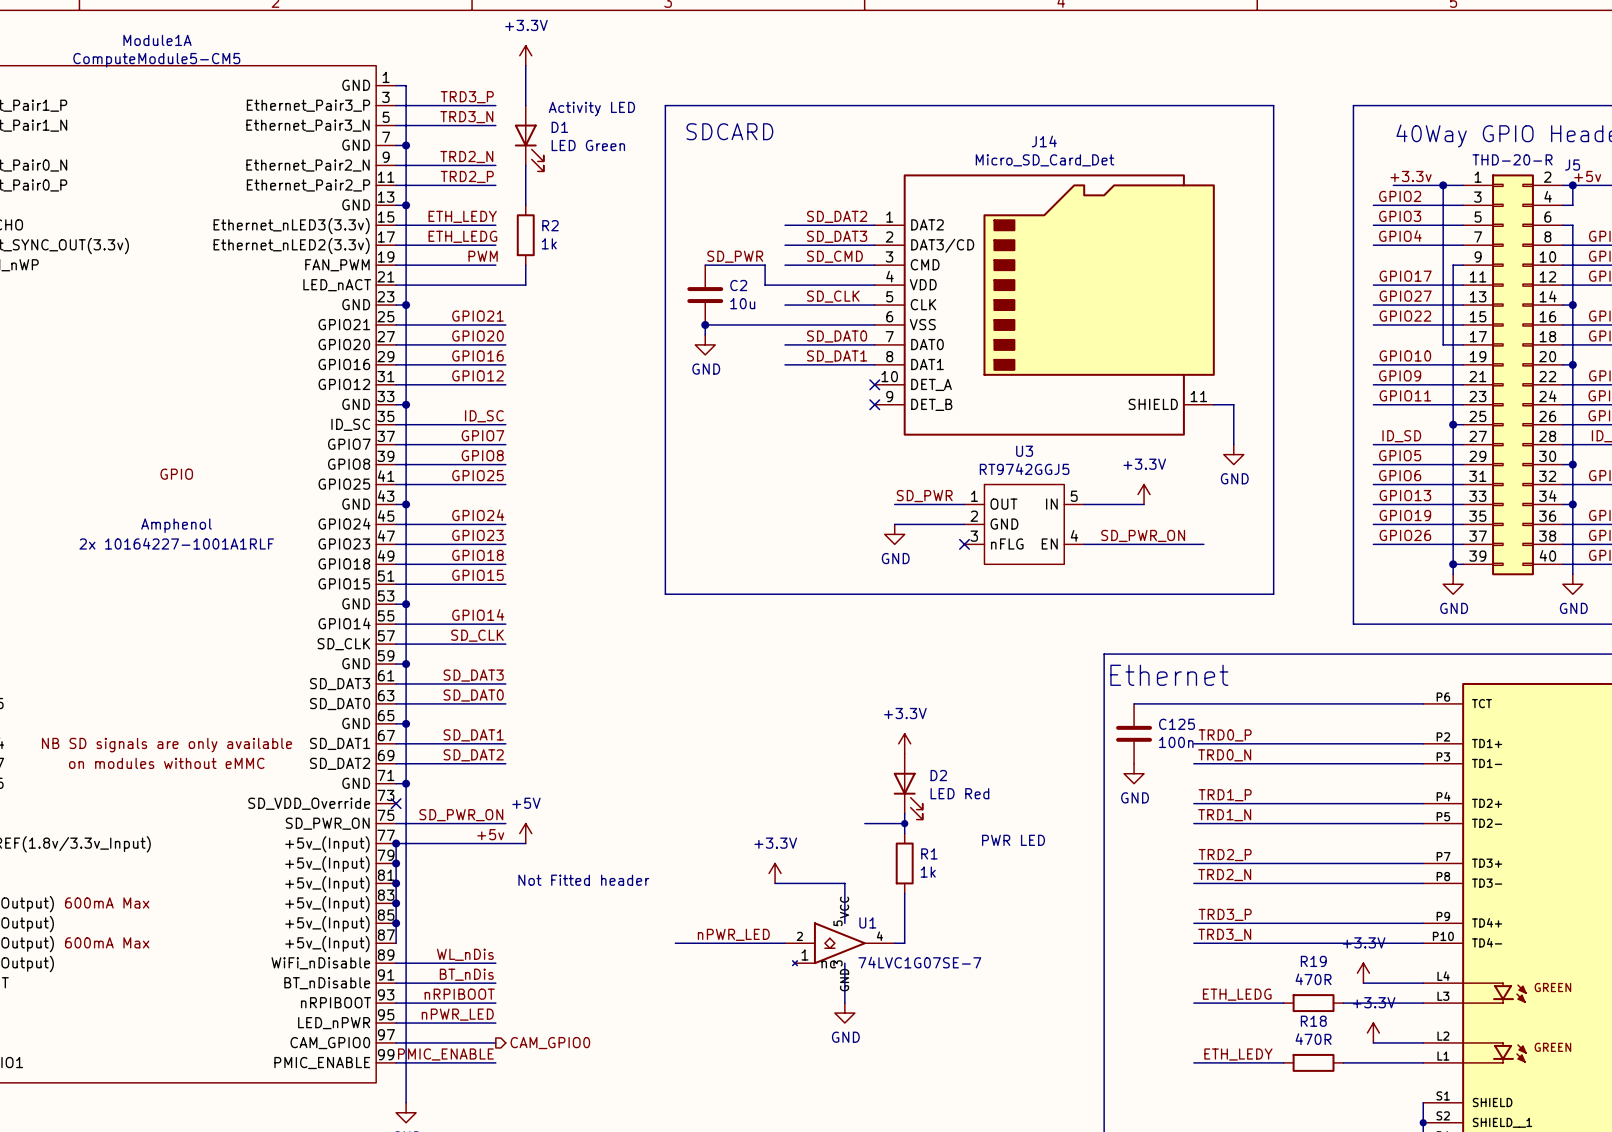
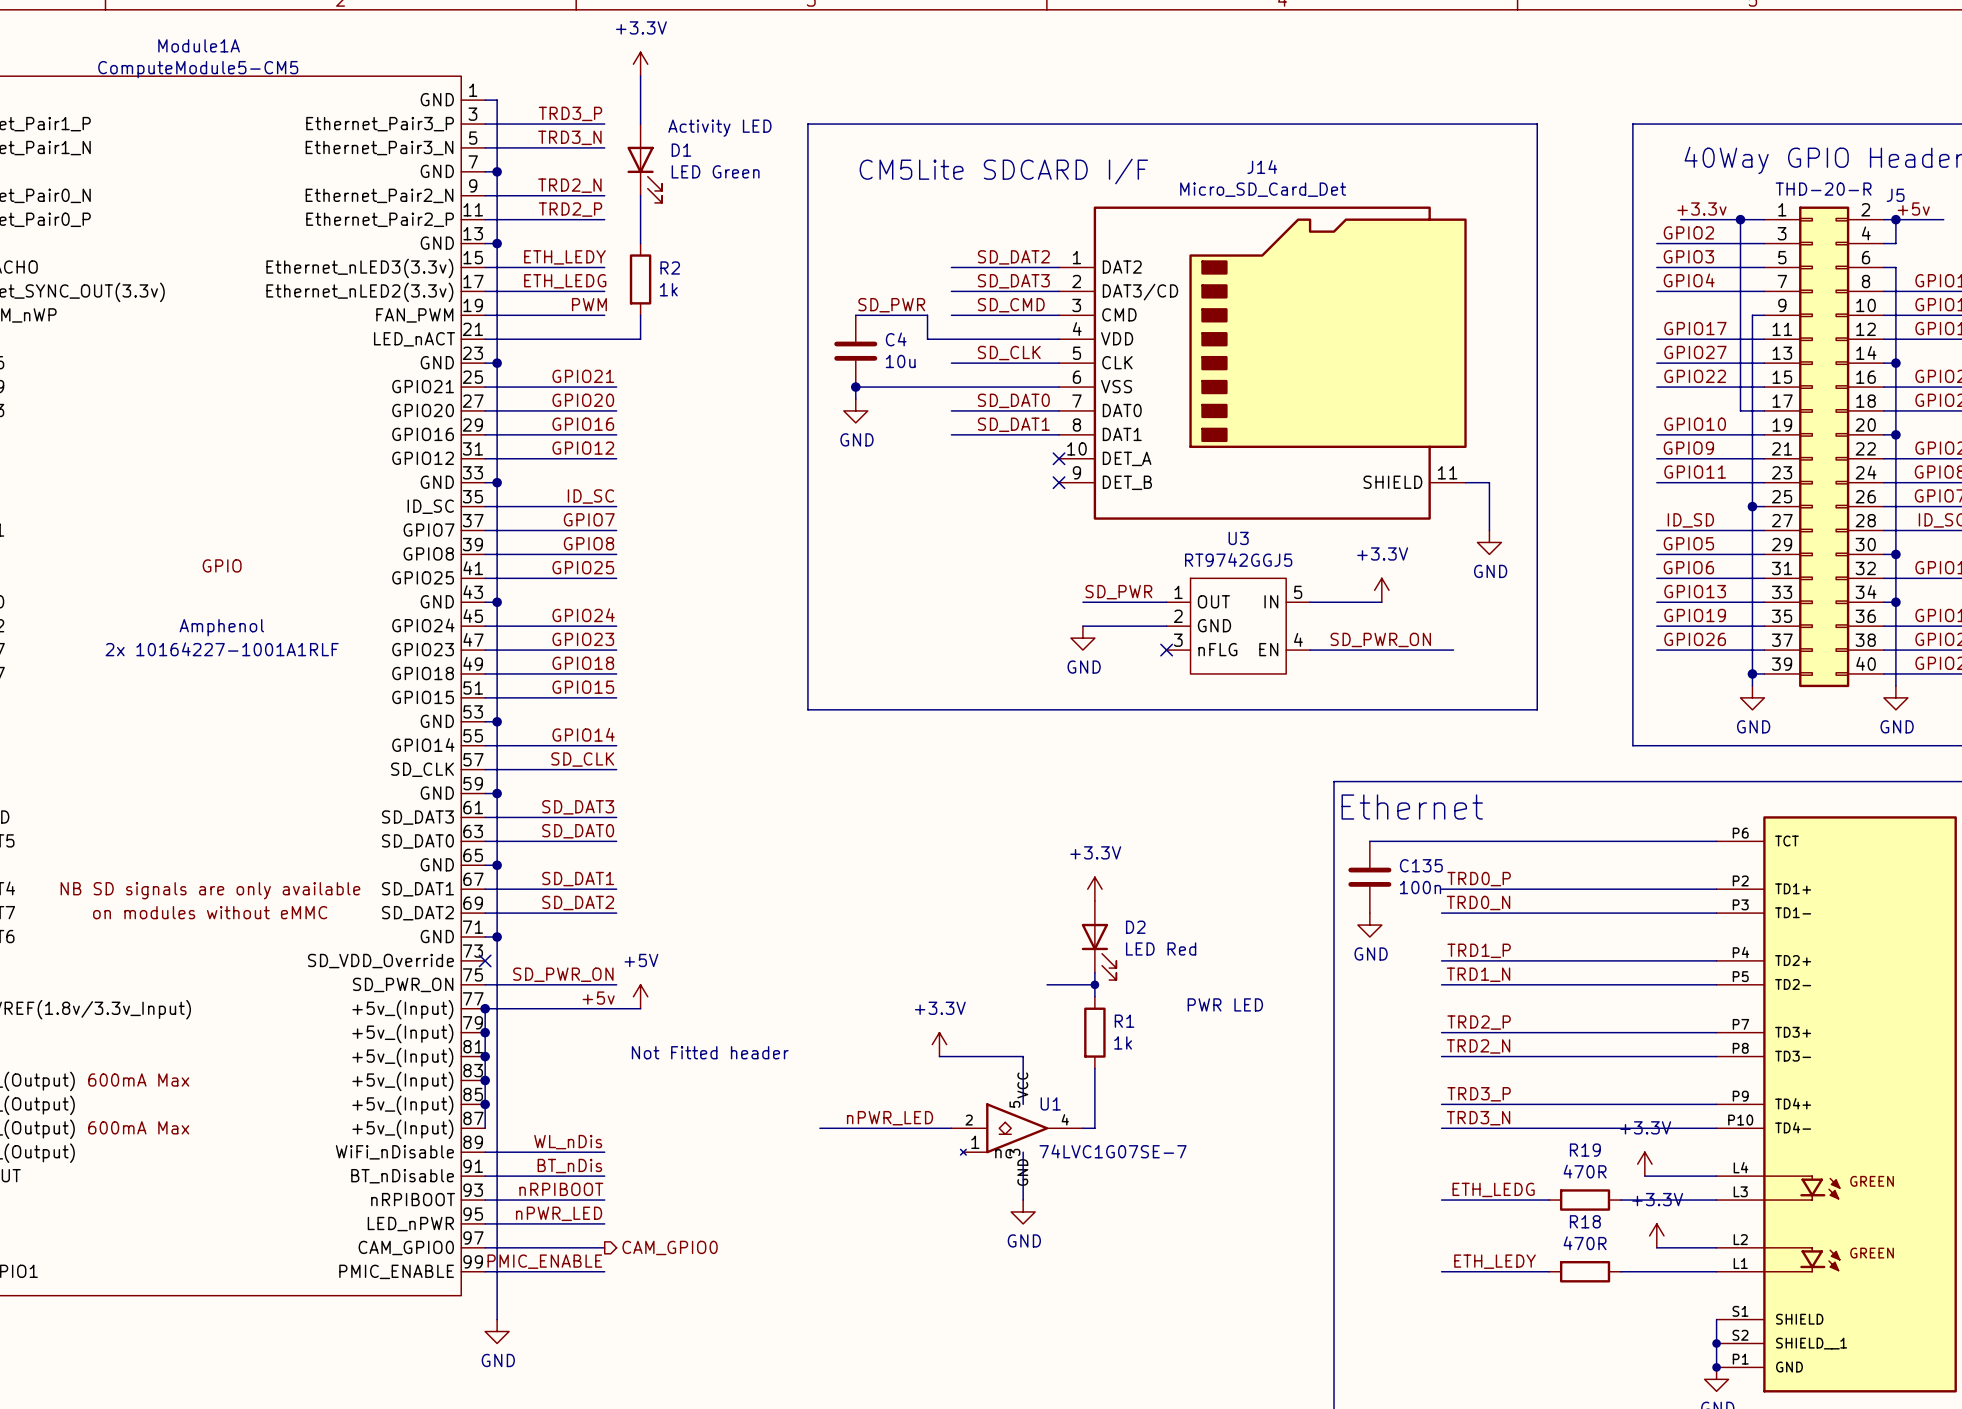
text: SDCARD (729, 131) -> none
text: none -> CM5Lite SDCARD I/F (1003, 171)
C2 name: C2 (738, 285) -> C4 (896, 339)
C125 name: C125 (1177, 724) -> C135 (1421, 865)

